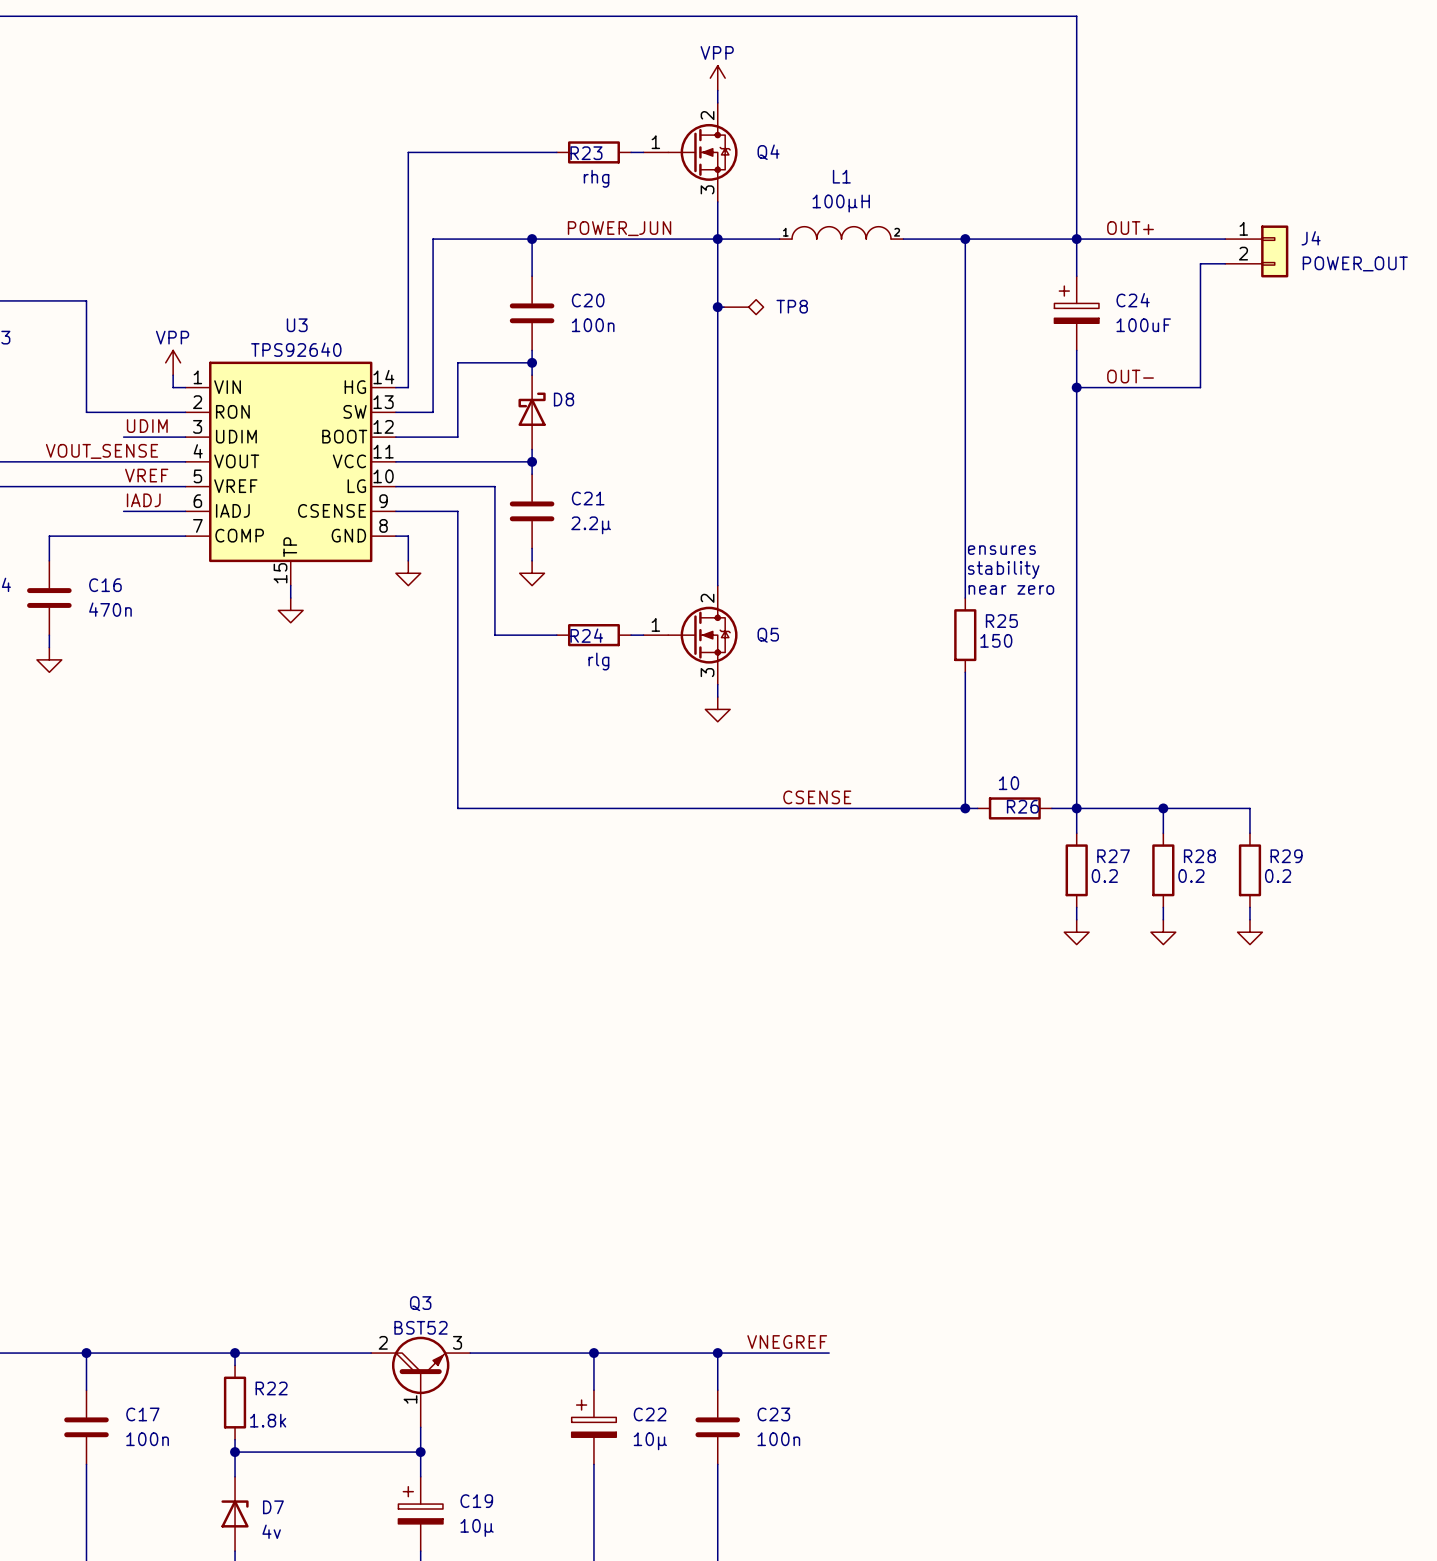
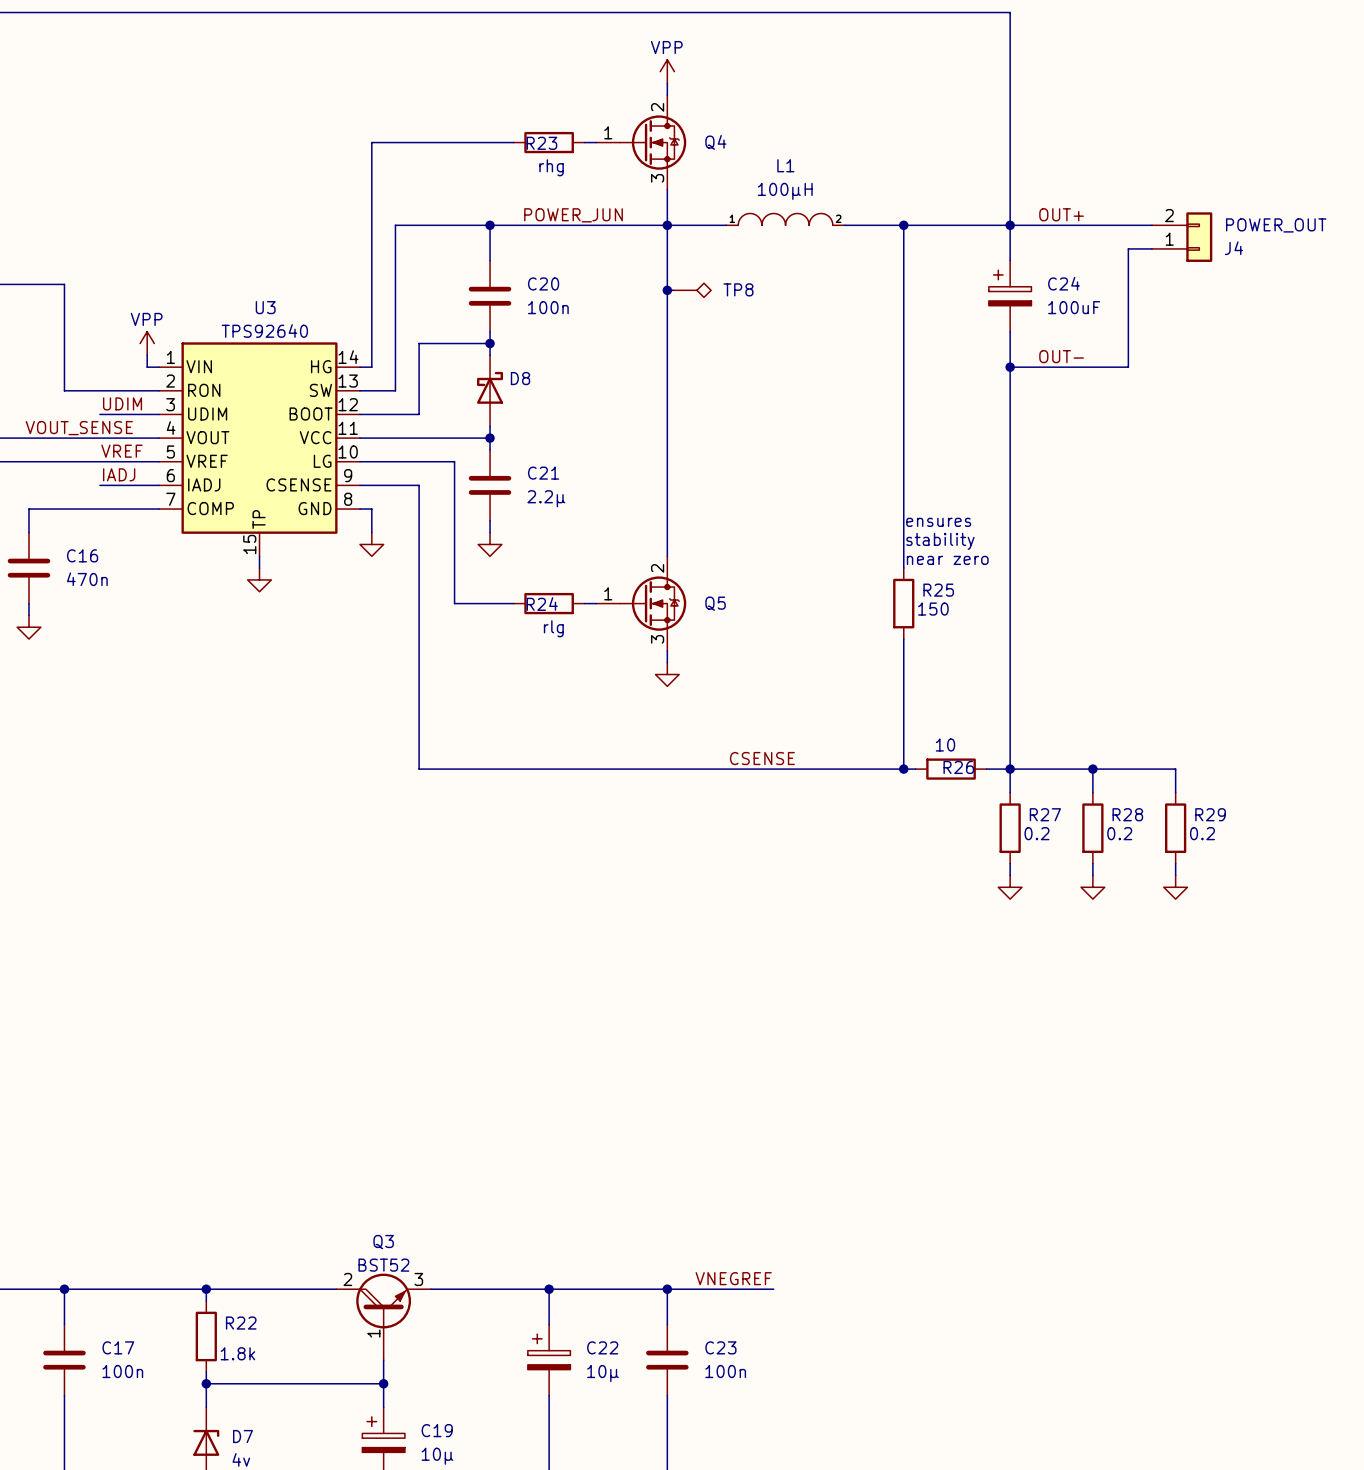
J4 flip: as is (1274, 251) -> up-down (1199, 237)

